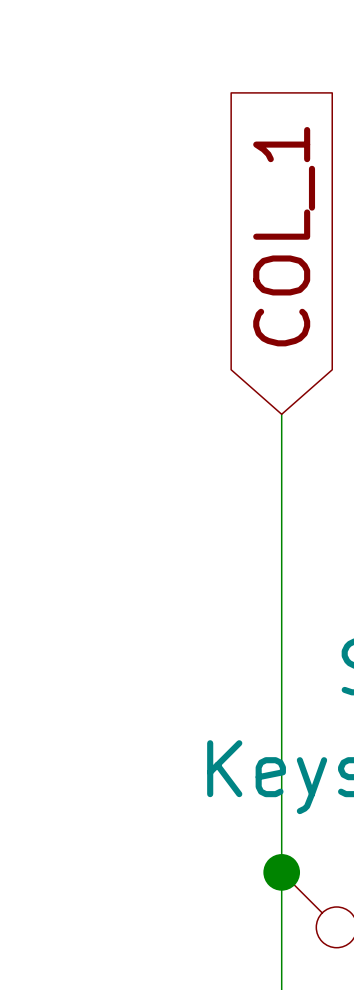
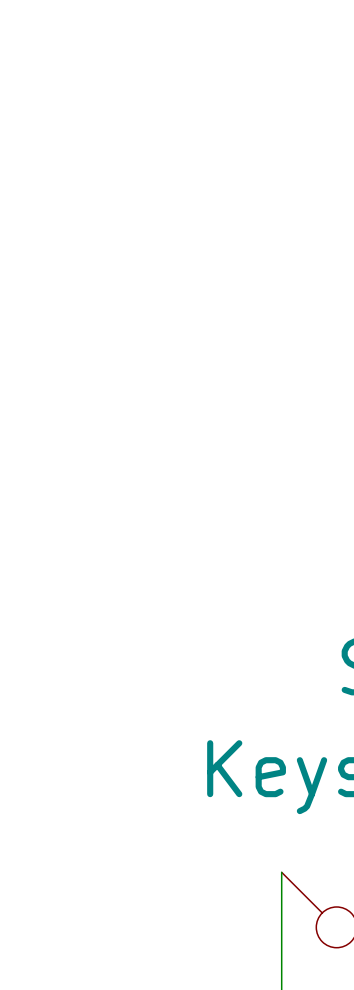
global label: COL_1 (284, 236) -> none
wire: (281, 414) (281, 872) -> none
junction: (281, 872) -> none

